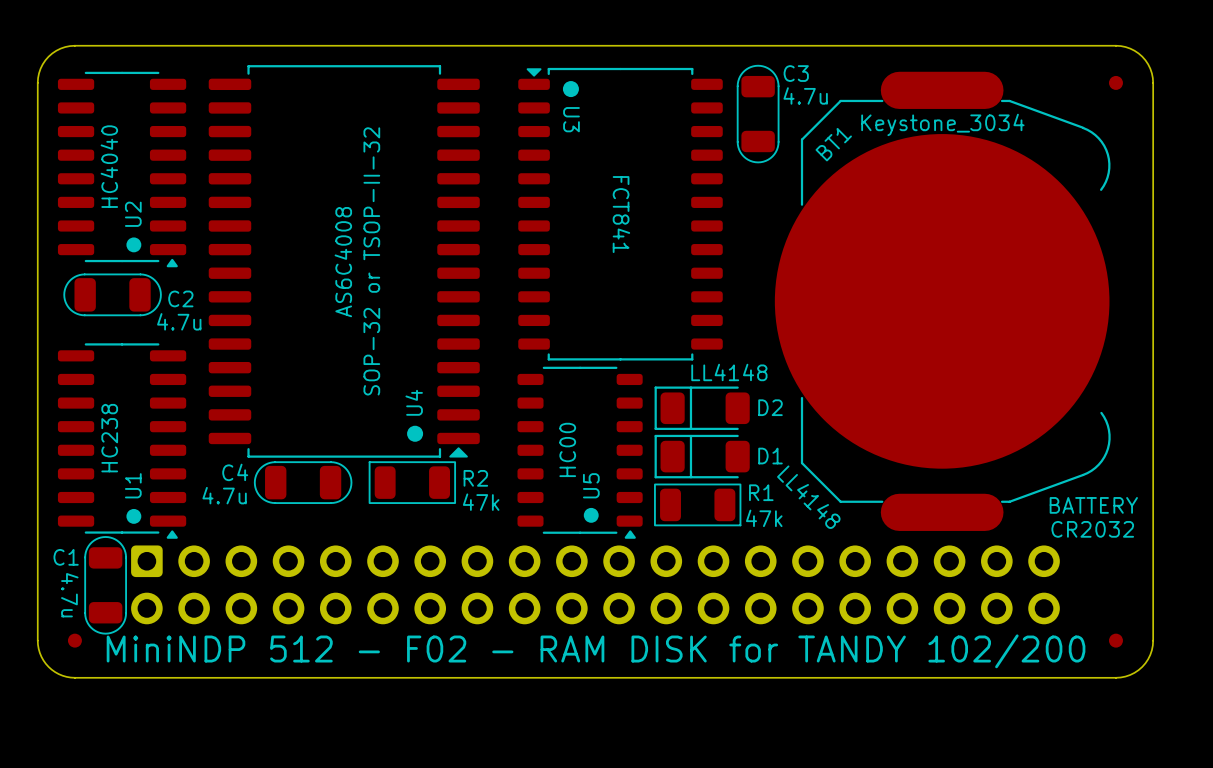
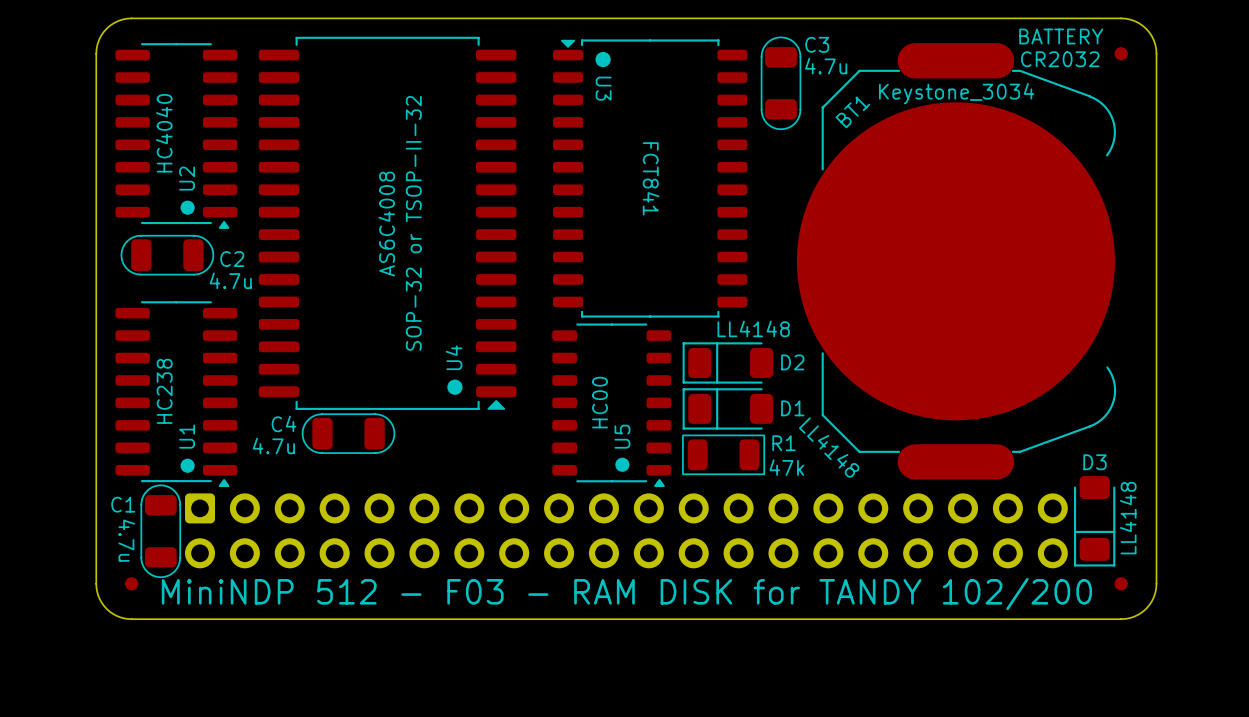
R2: 47k (412, 482) -> none
text position: BATTERY (1093, 505) -> BATTERY (1061, 36)
text position: CR2032 (1092, 529) -> CR2032 (1060, 59)
D3: none -> LL4148 (1094, 521)
text: MiniNDP 512 - F02 - RAM DISK for TANDY 102/200 (596, 651) -> MiniNDP 512 - F03 - RAM DISK for TANDY 102/200 (626, 594)

